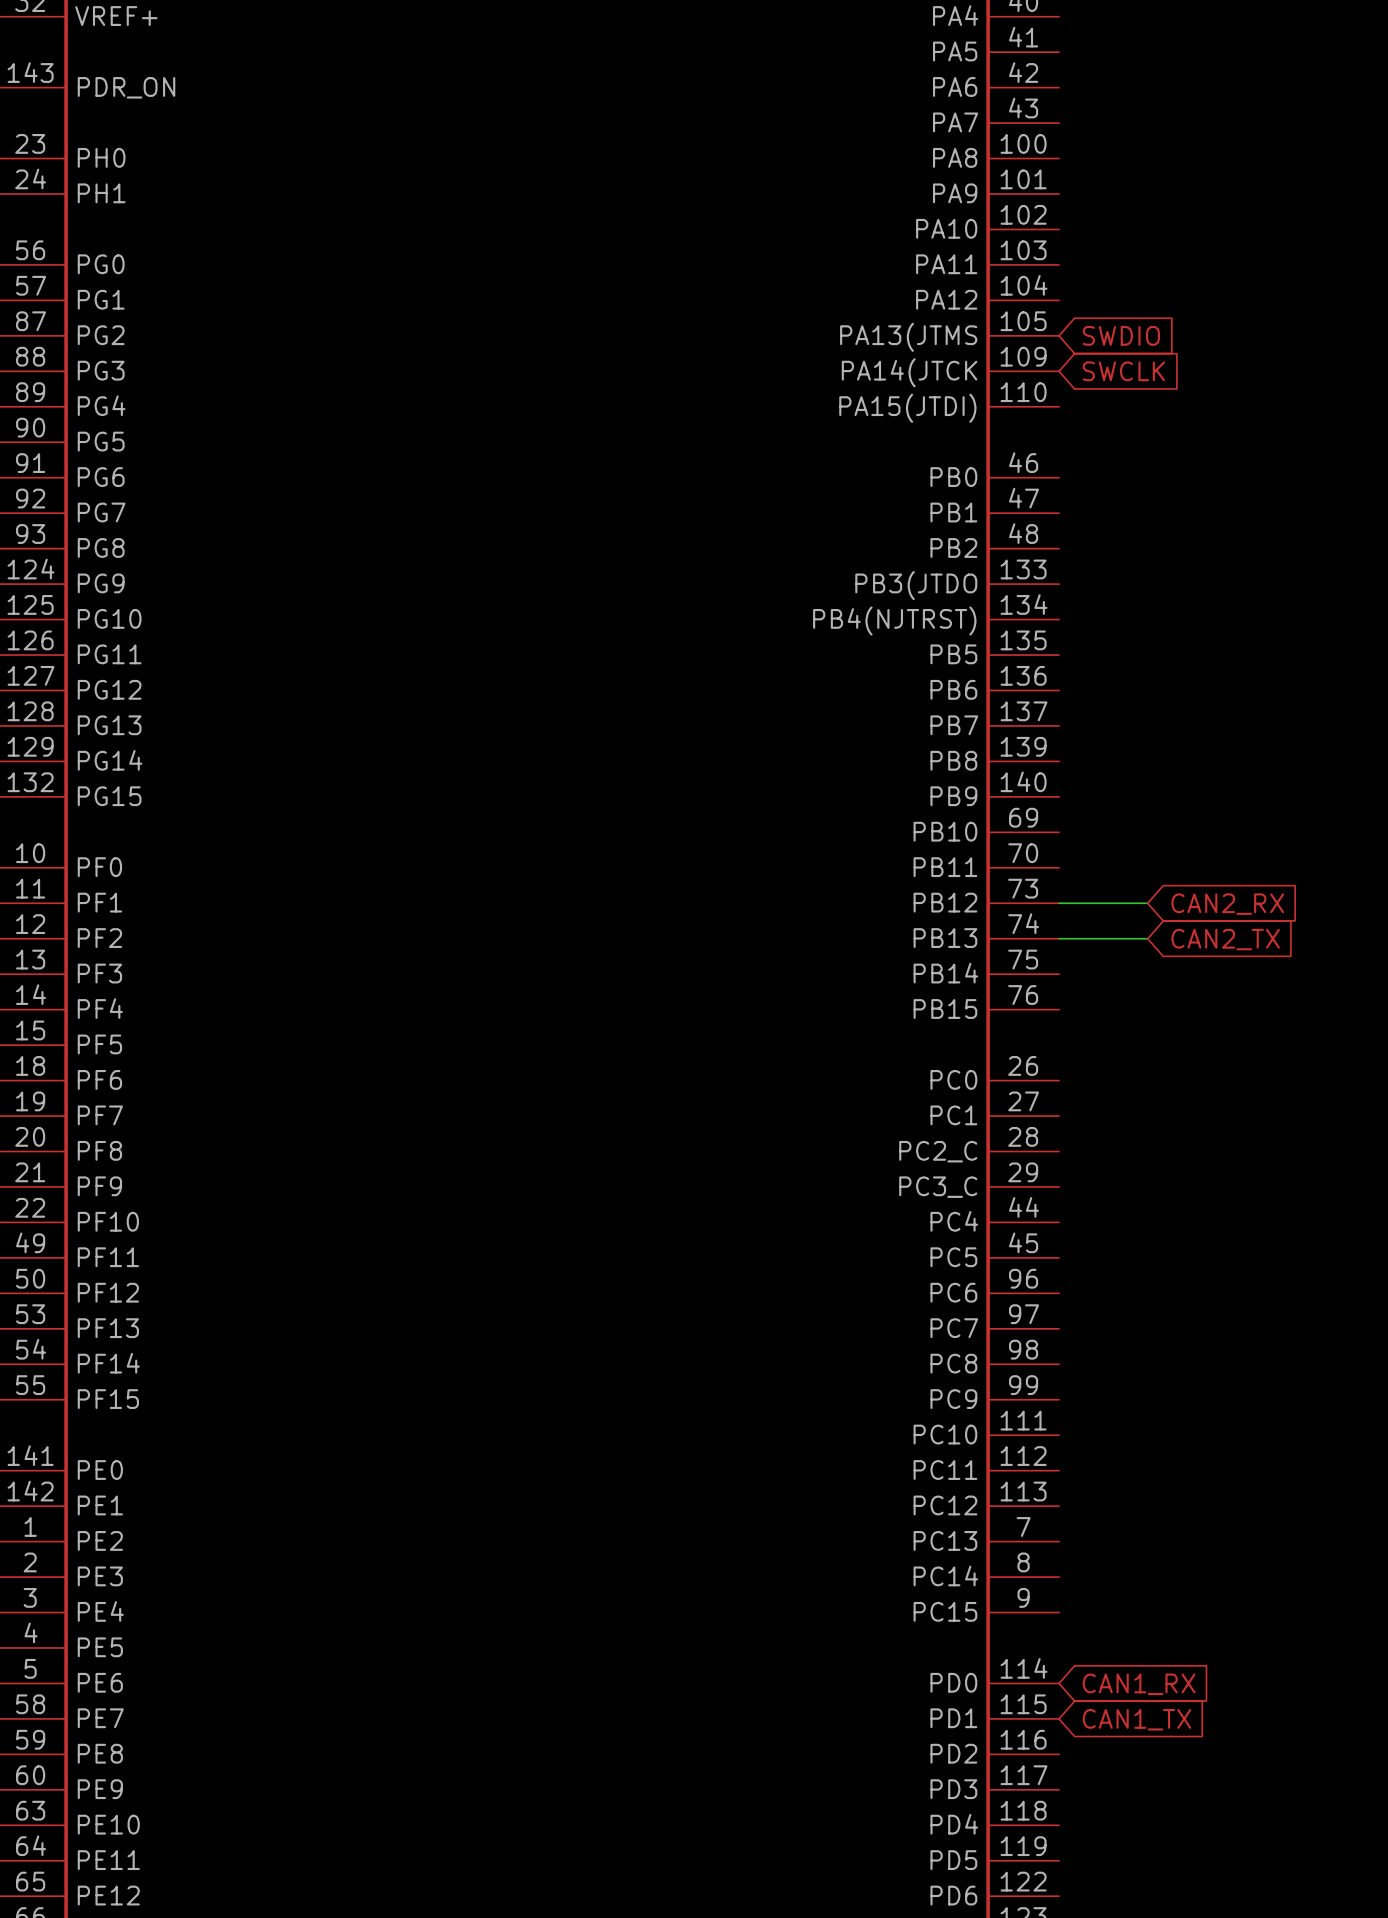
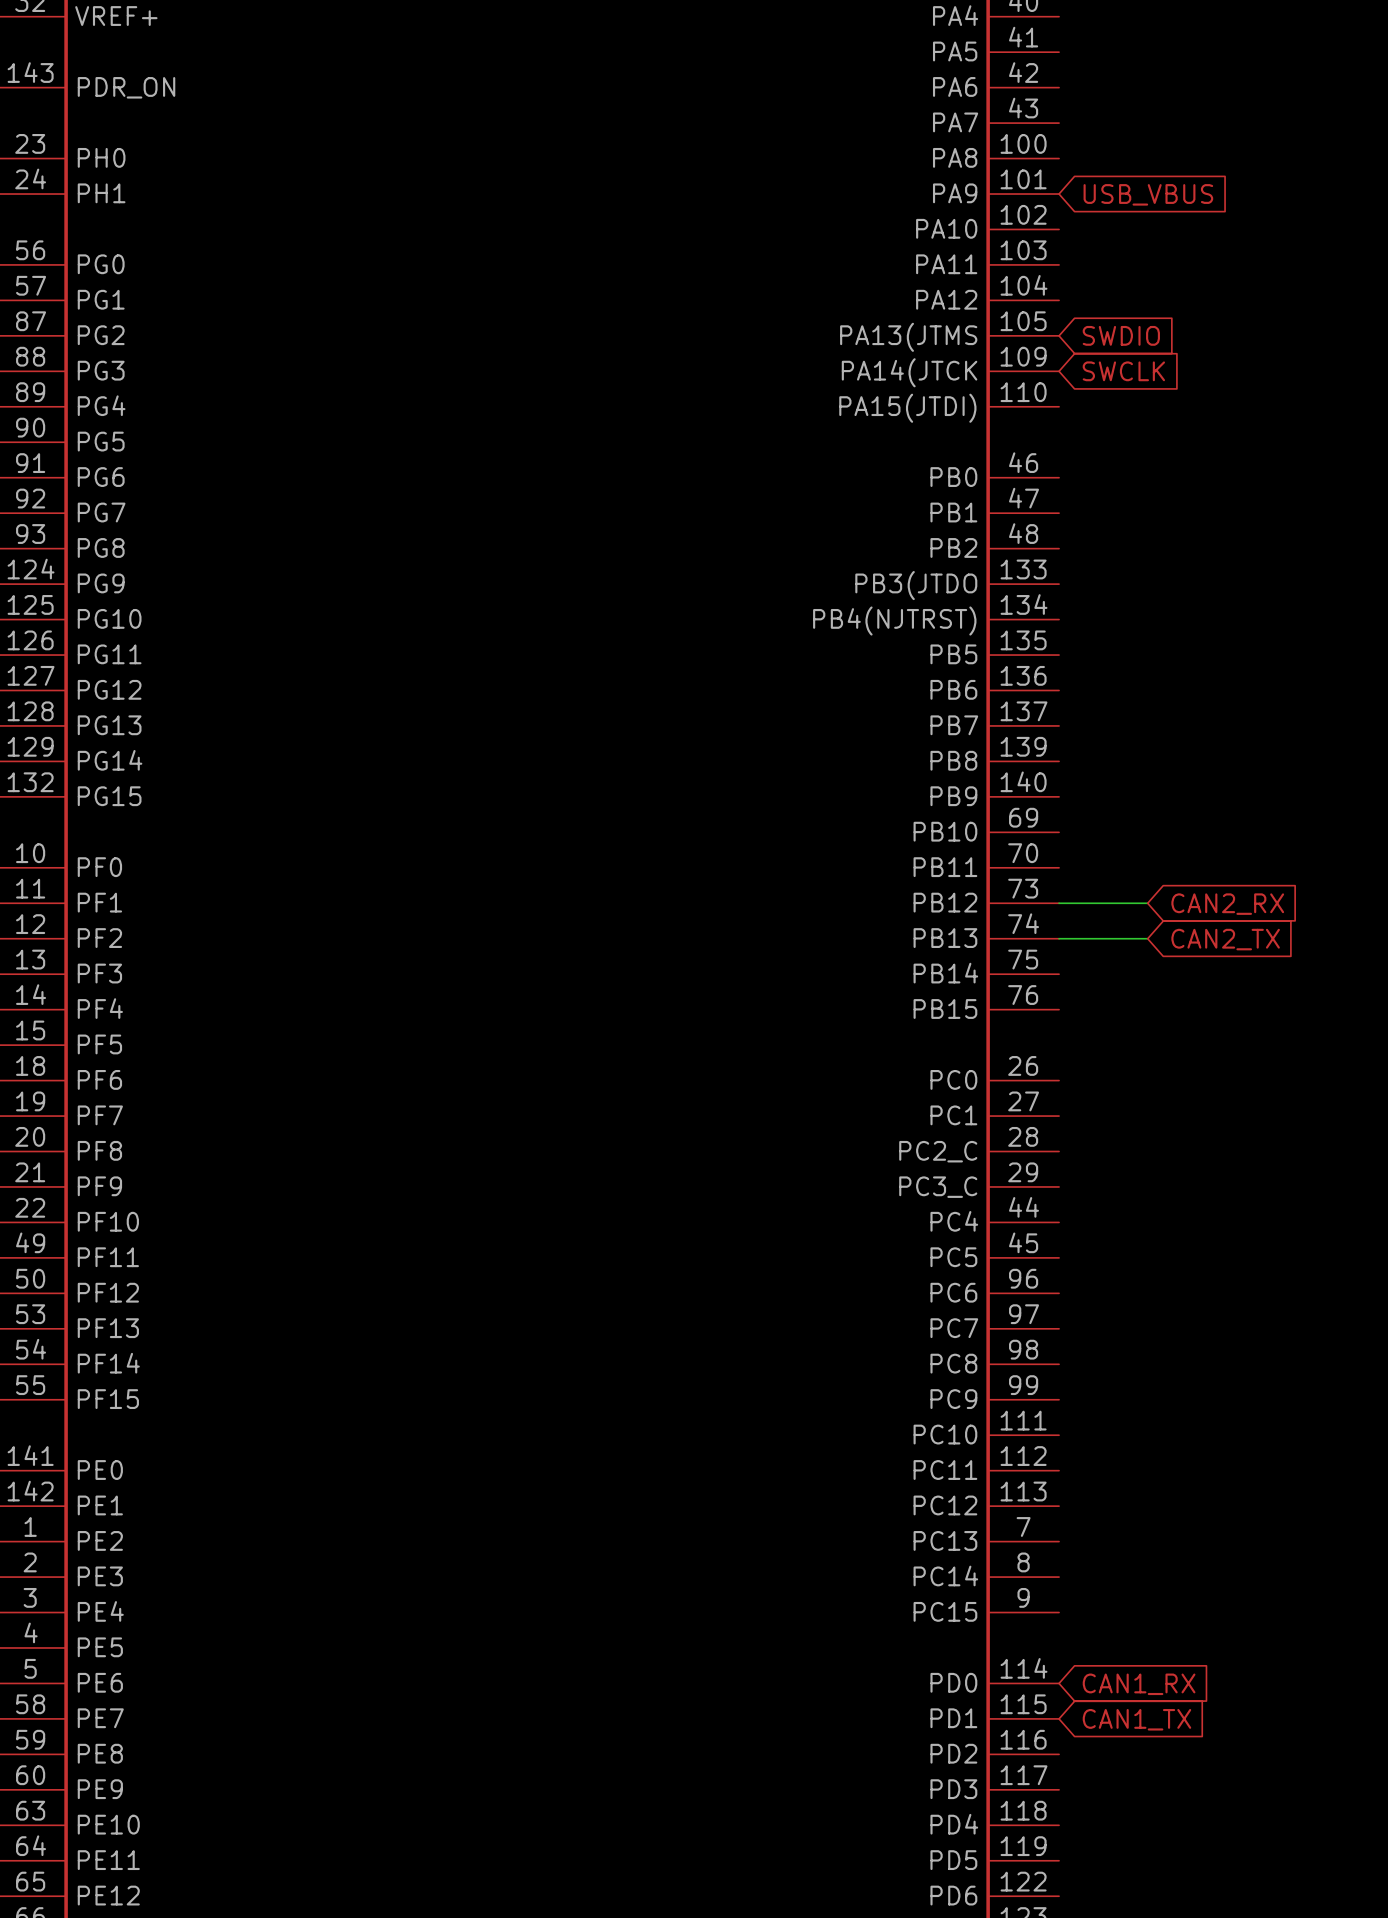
global label: none -> USB_VBUS (1148, 194)

